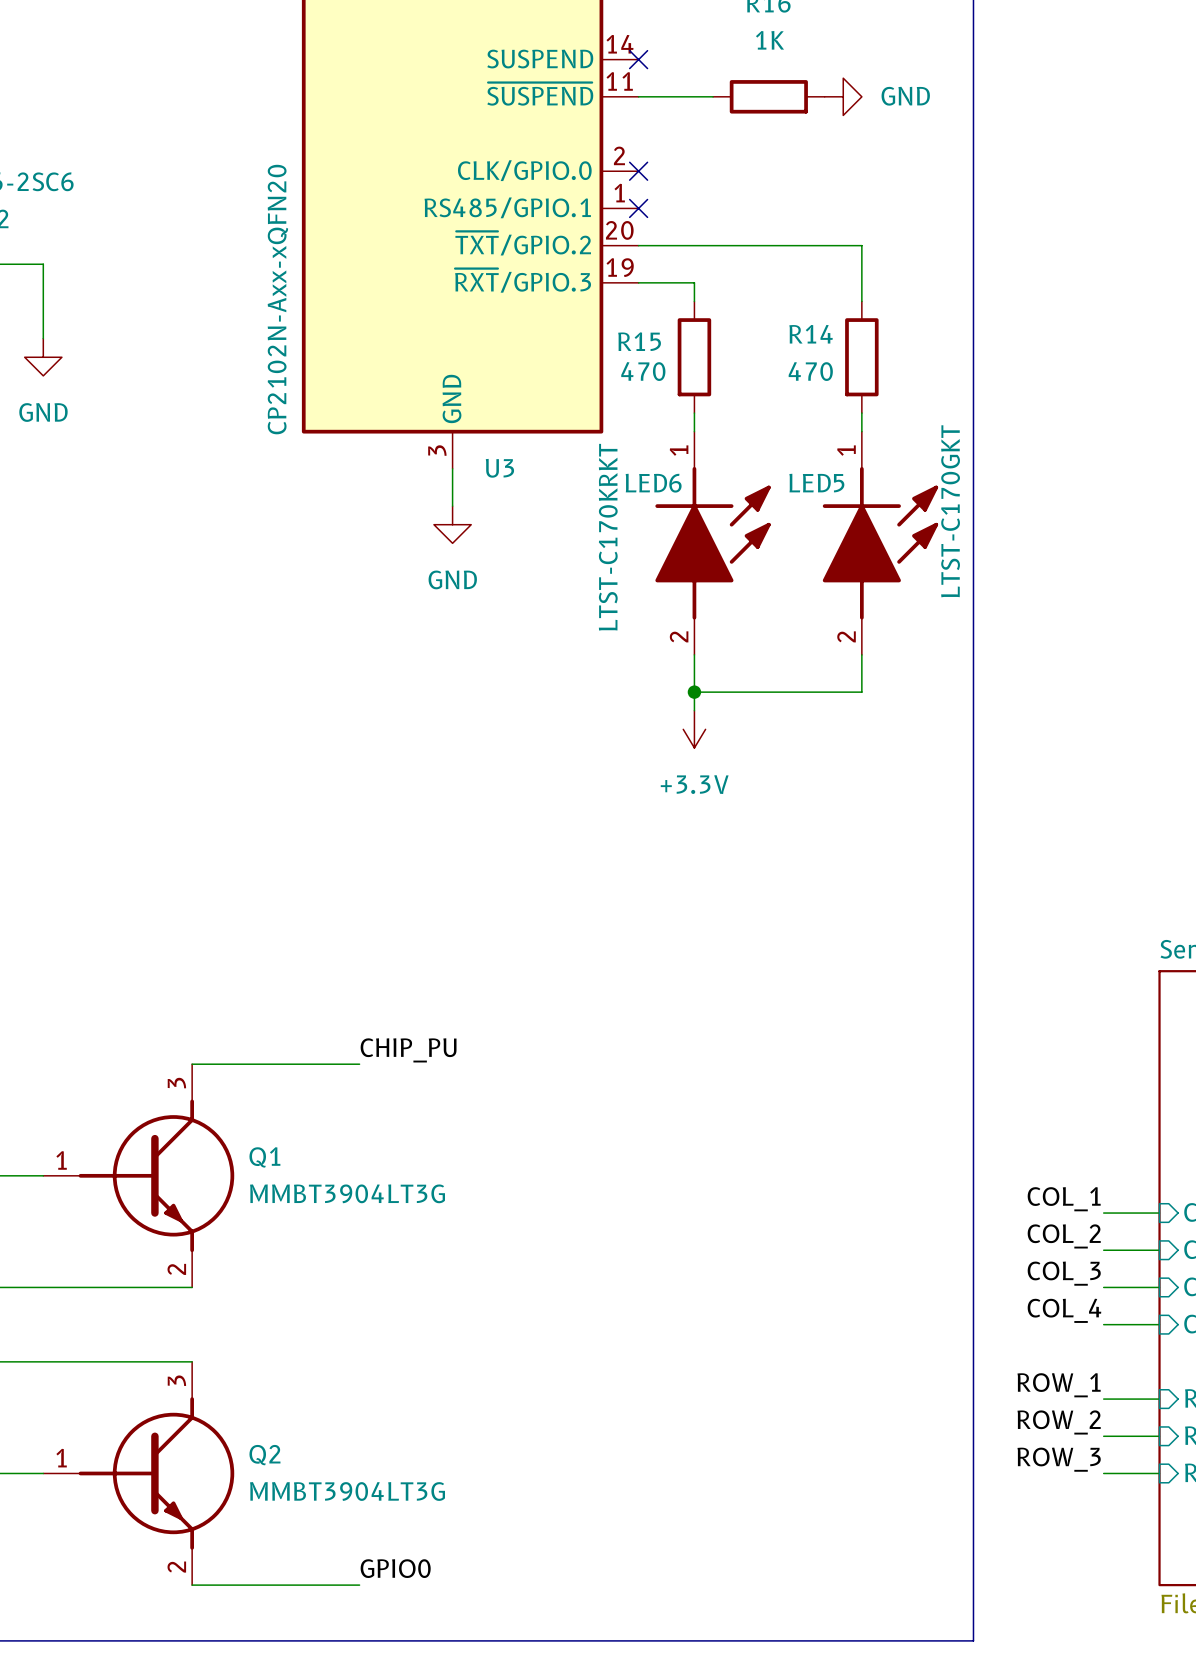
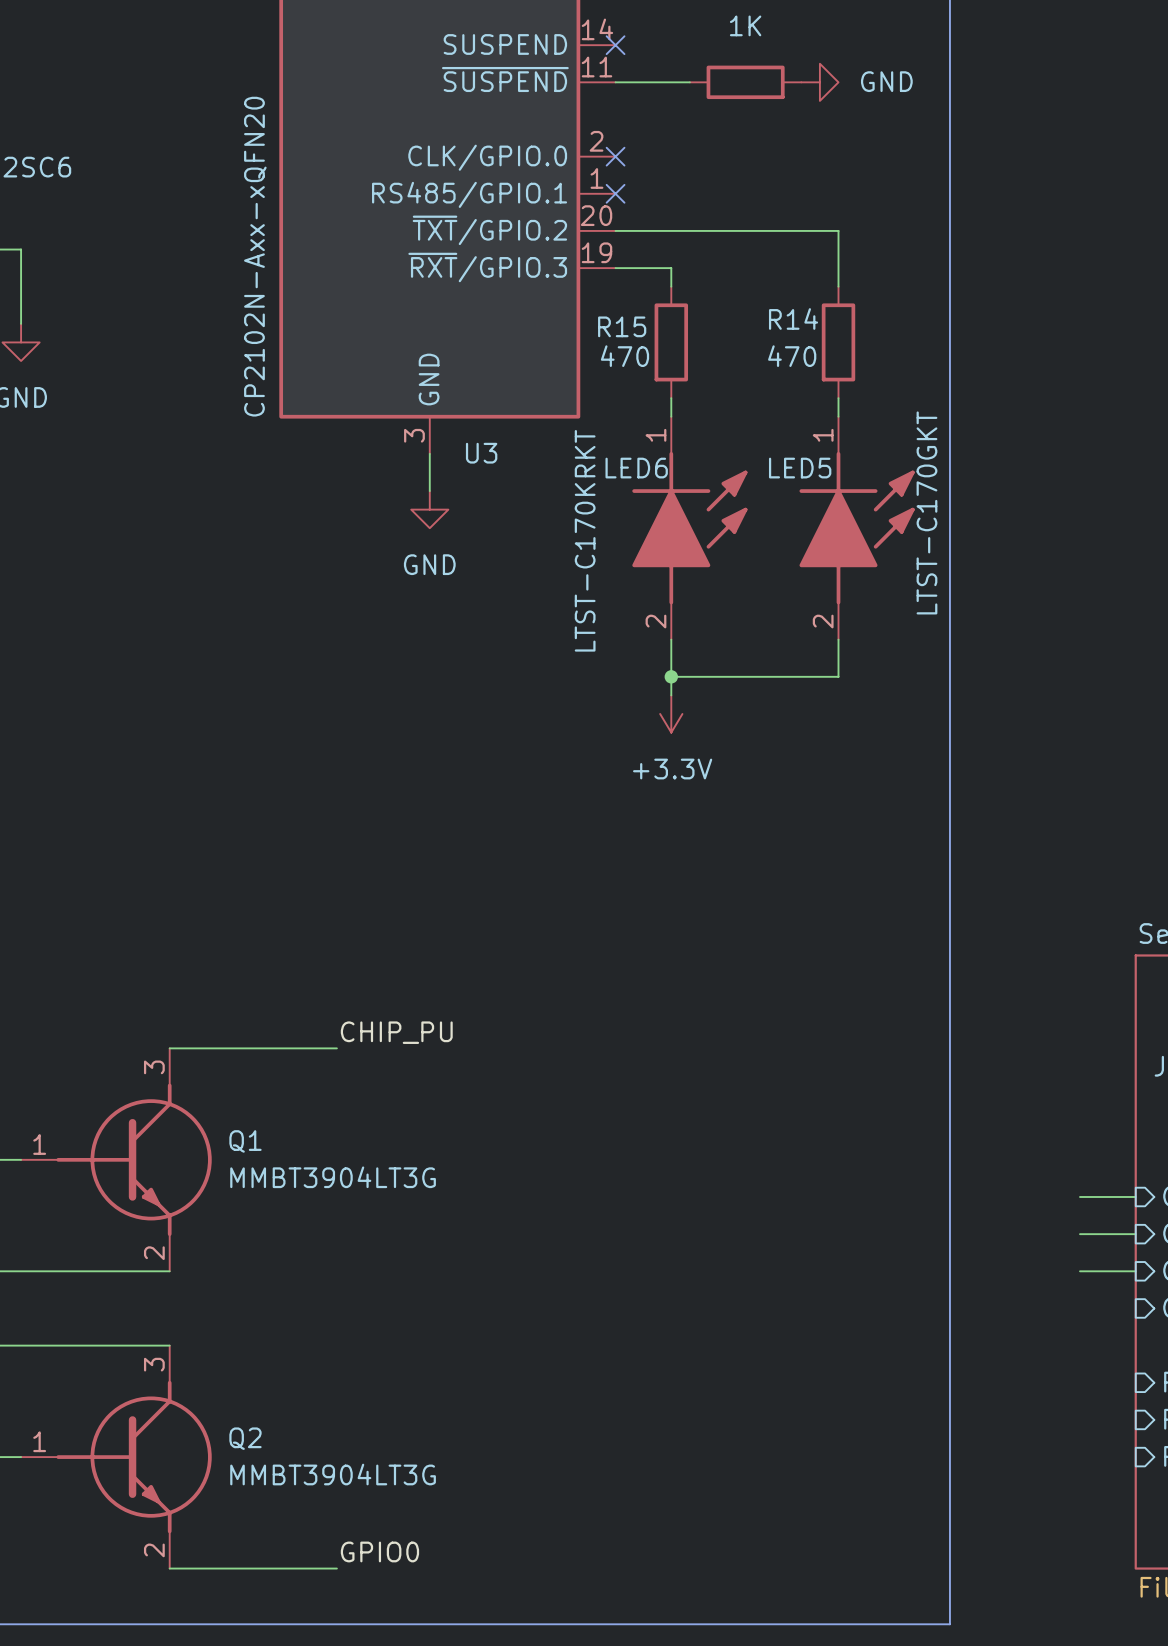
label: COL_1 (1064, 1199) -> none
label: COL_2 (1064, 1236) -> none
label: COL_3 (1064, 1273) -> none
label: COL_4 (1064, 1310) -> none
wire: (1103, 1324) (1159, 1324) -> none
label: ROW_1 (1059, 1385) -> none
wire: (1103, 1399) (1159, 1399) -> none
label: ROW_2 (1059, 1422) -> none
wire: (1103, 1436) (1159, 1436) -> none
label: ROW_3 (1059, 1459) -> none
wire: (1103, 1473) (1159, 1473) -> none

